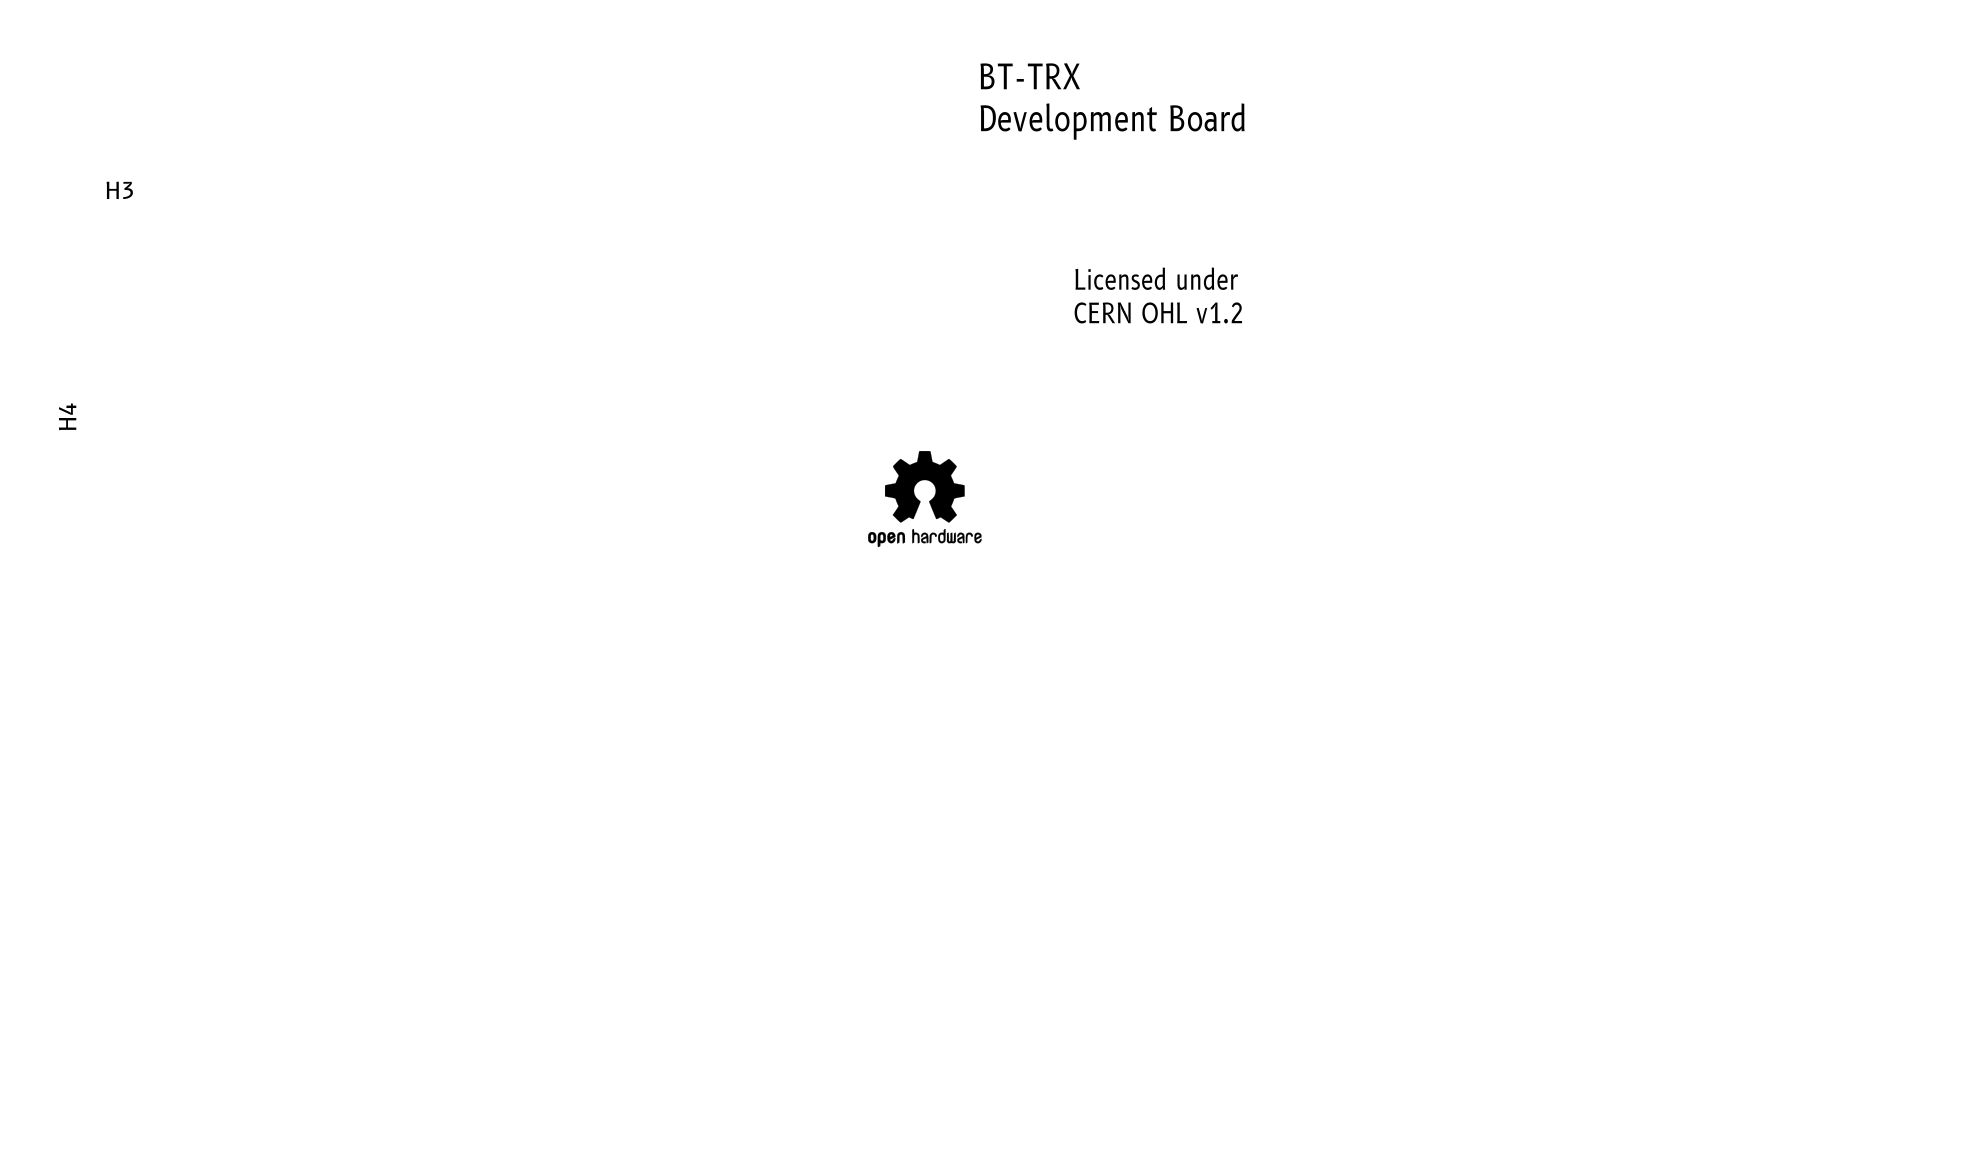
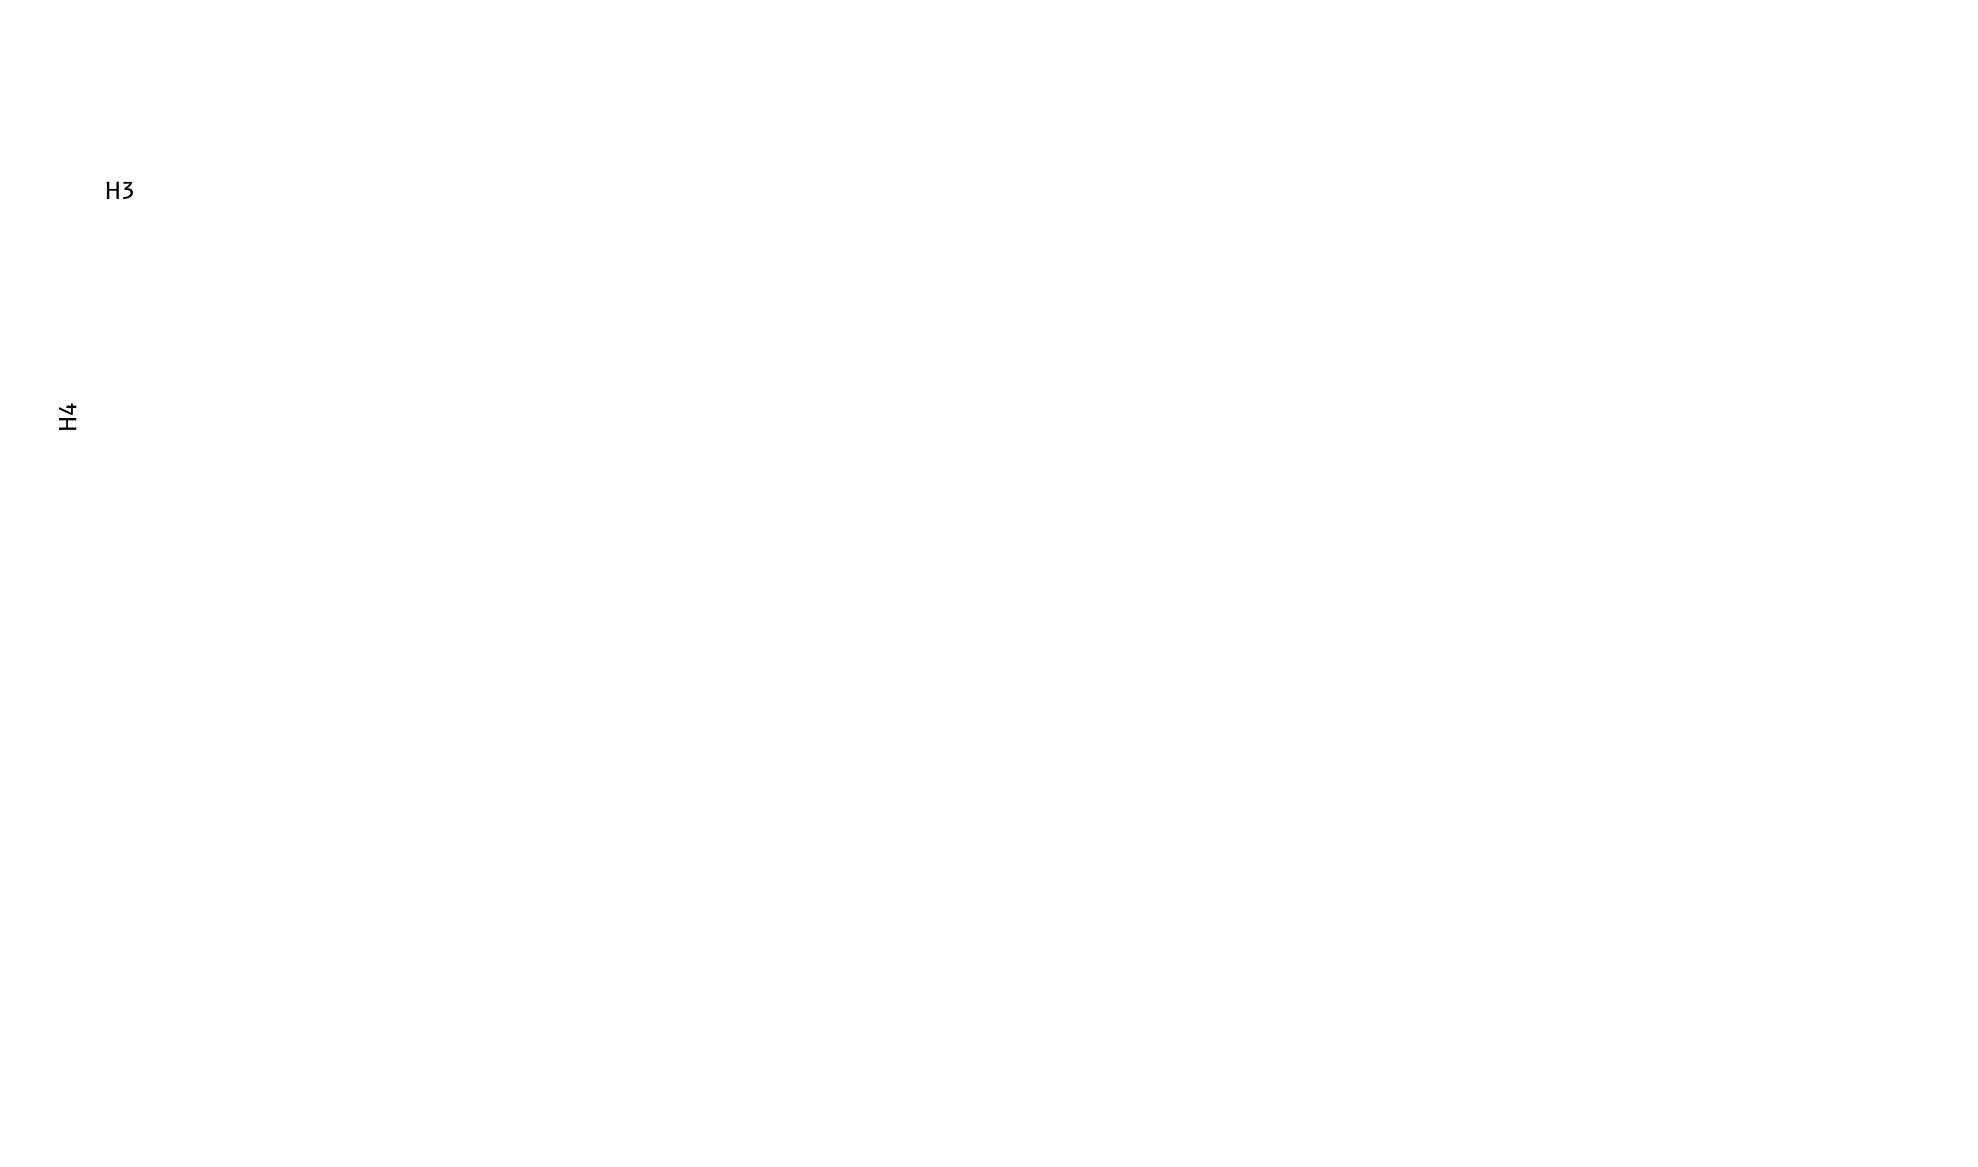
text: BT-TRX (1030, 76) -> none
text: Development Board (1112, 121) -> none
text: Licensed under (1156, 278) -> none
text: CERN OHL v1.2 (1158, 312) -> none
drawing: [868, 451, 982, 548] -> none

